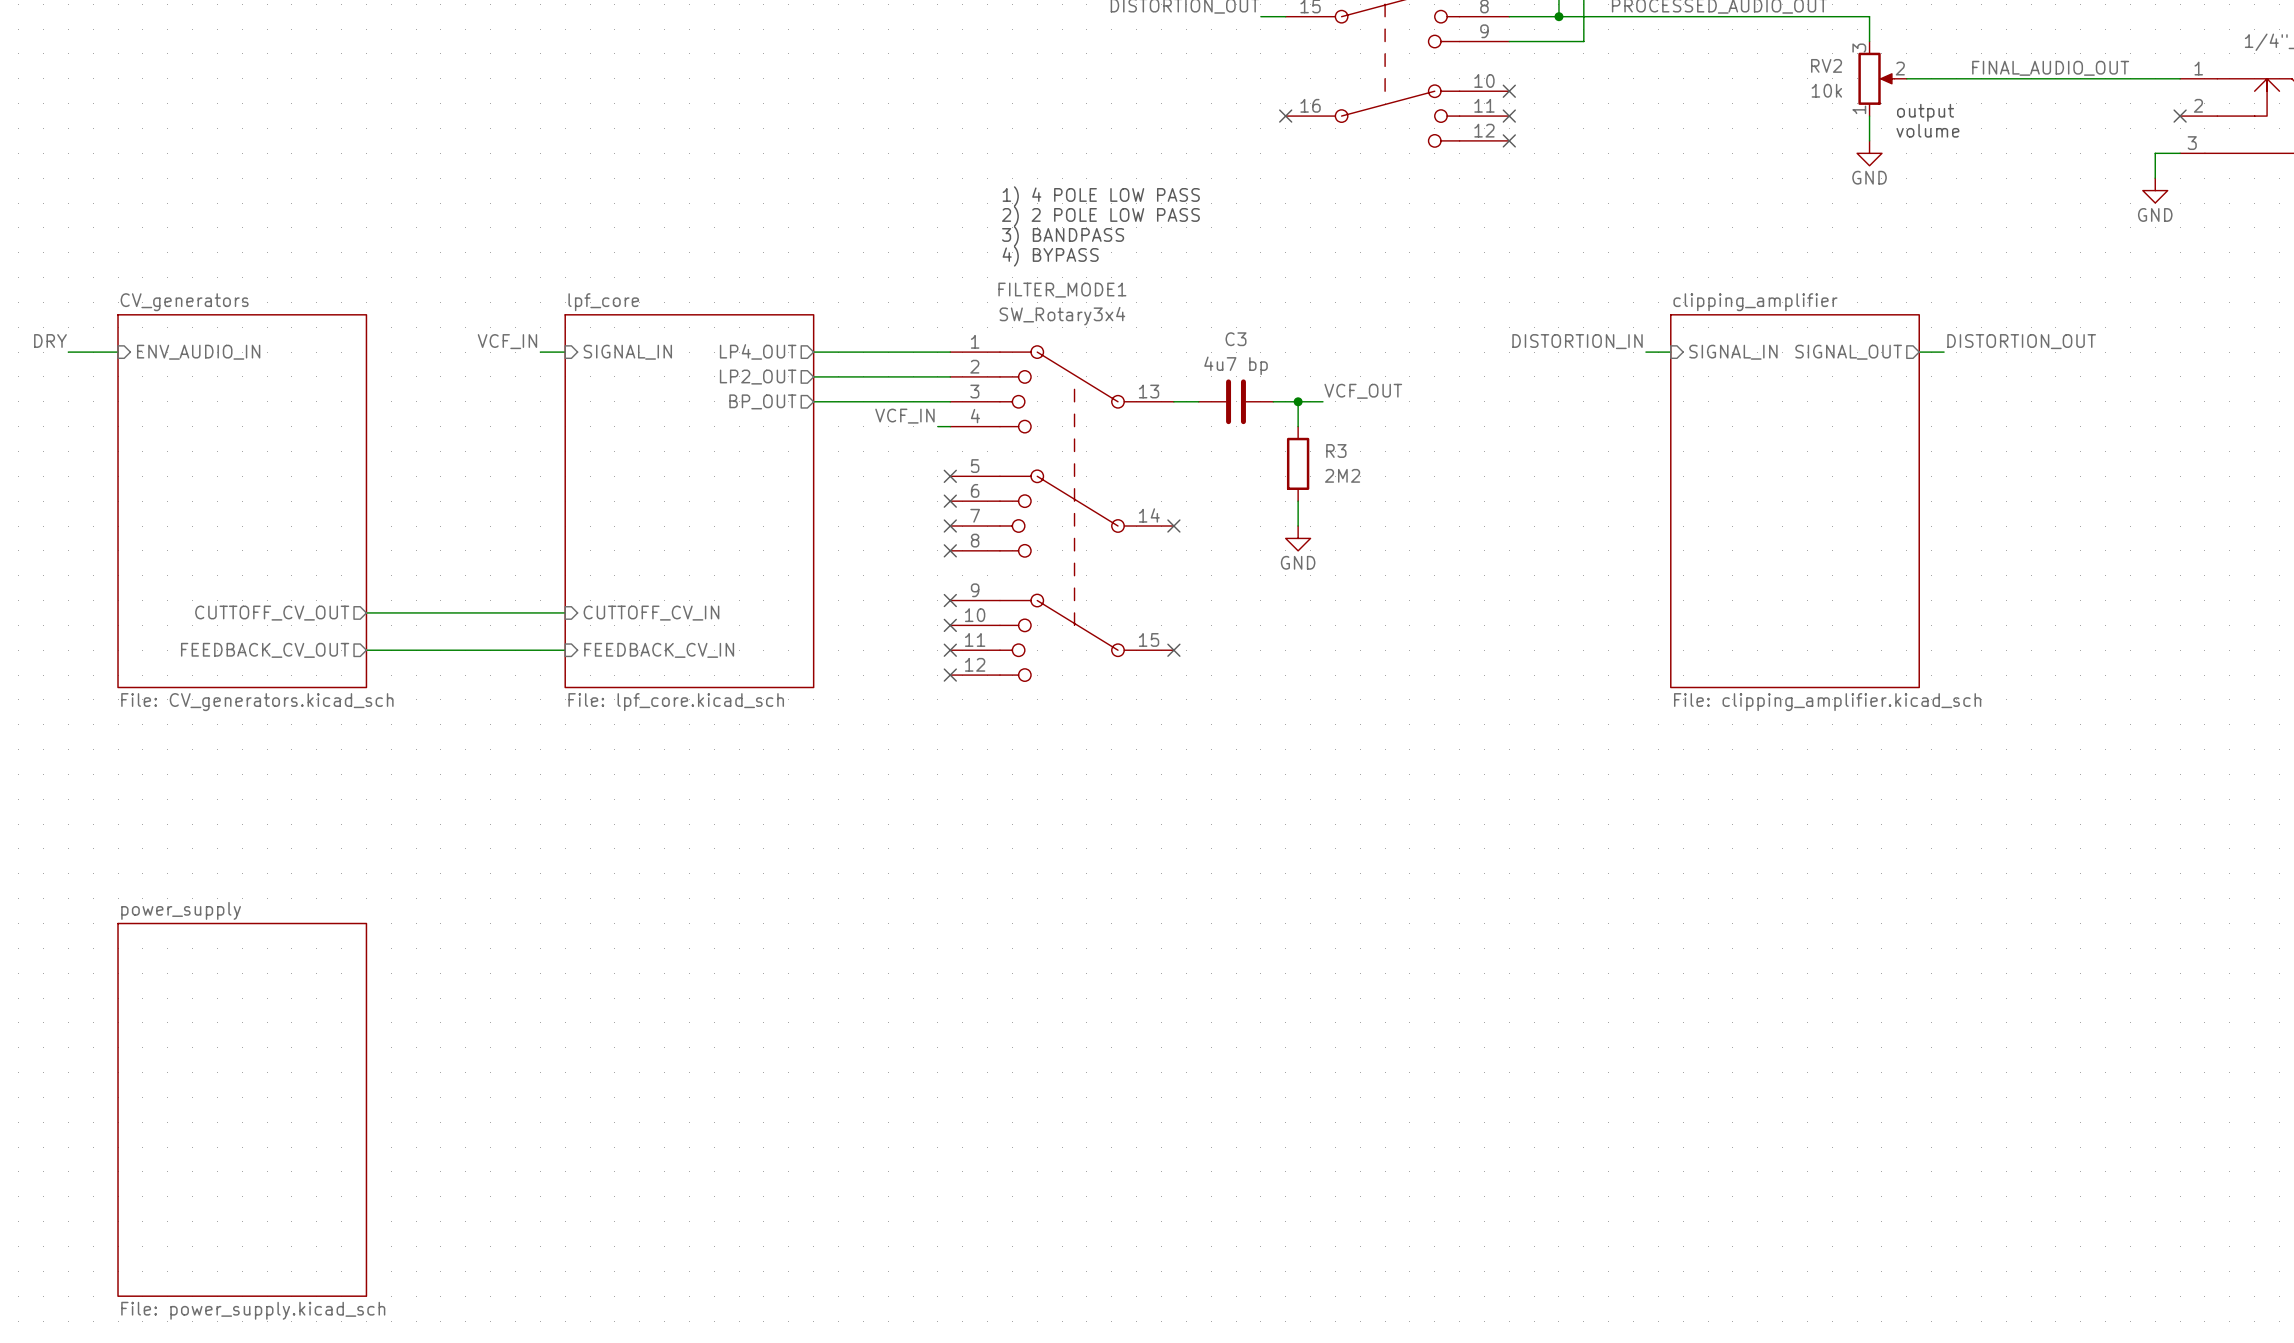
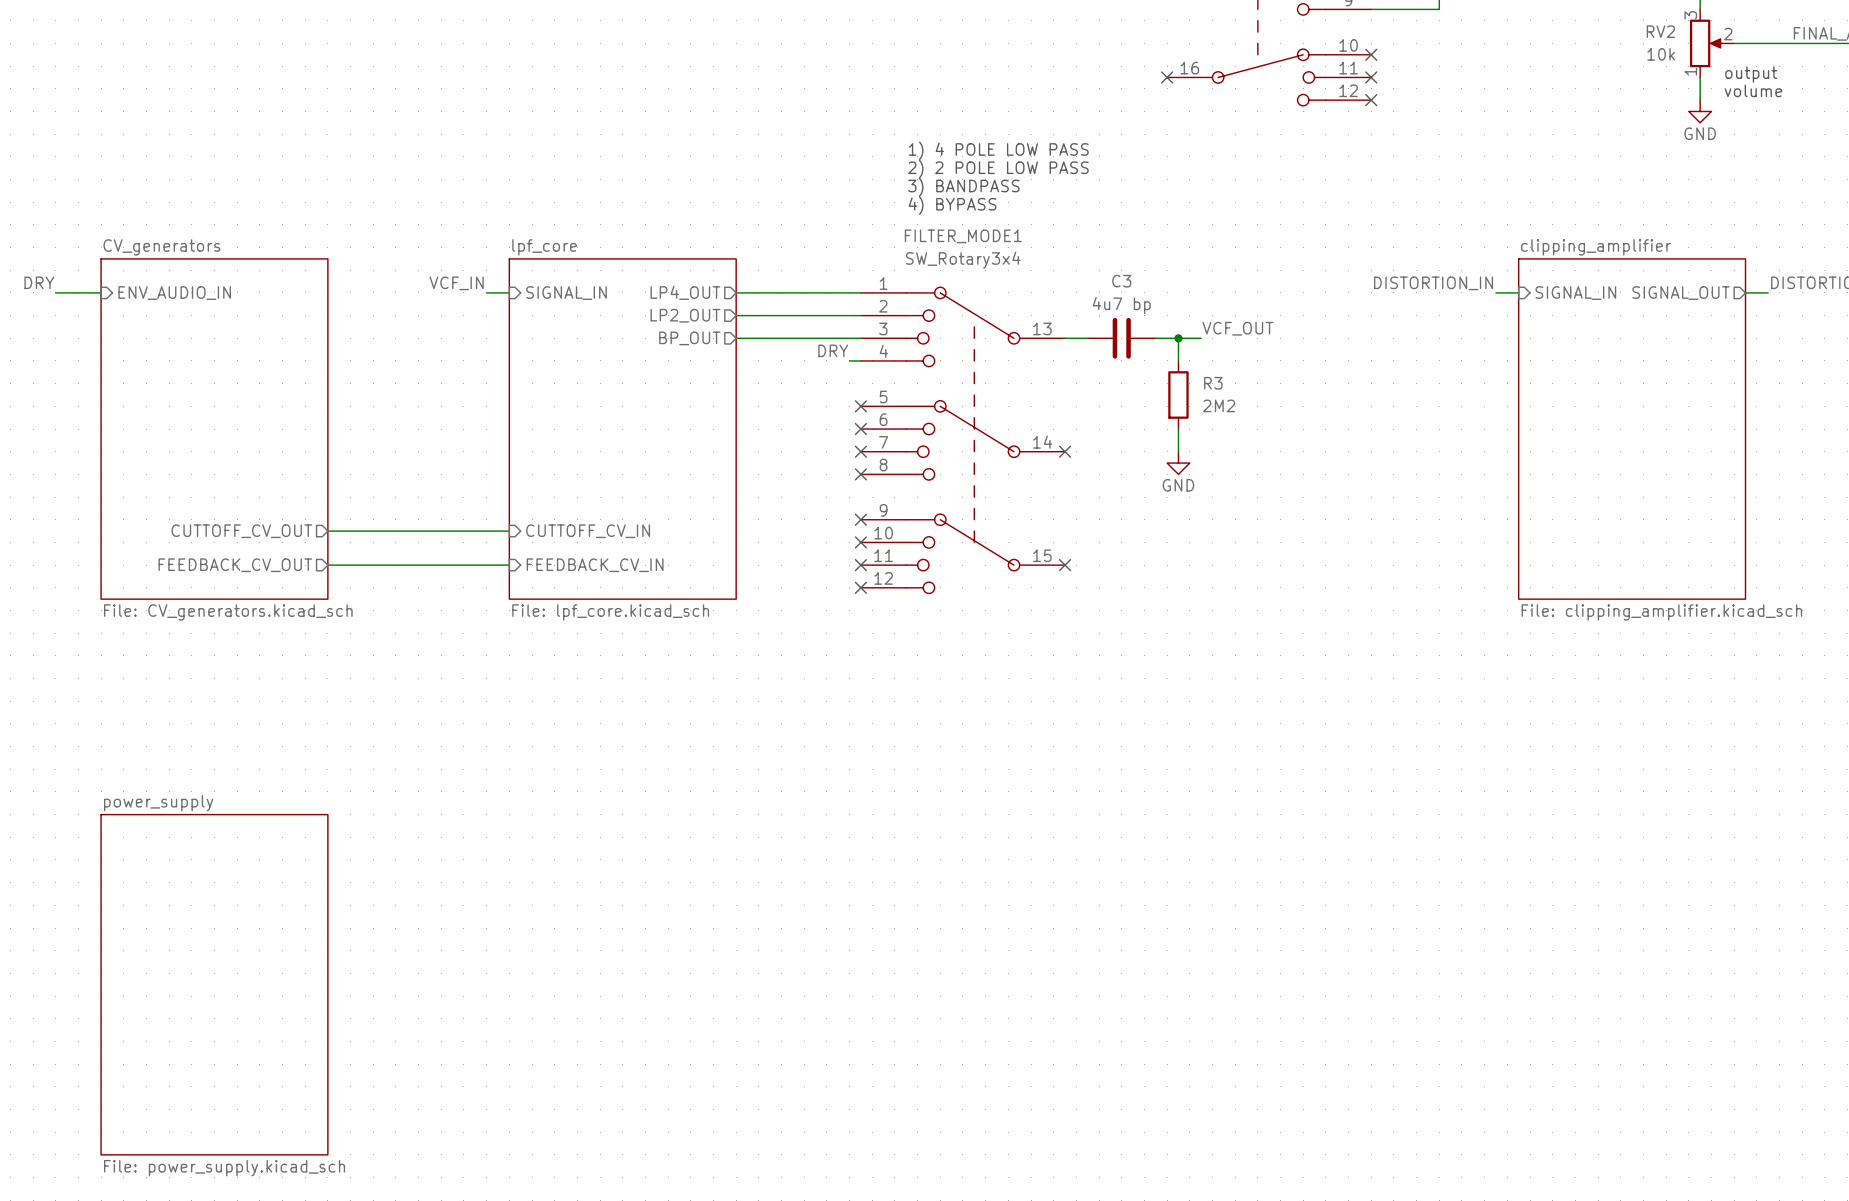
label: VCF_IN (904, 416) -> DRY (833, 350)

